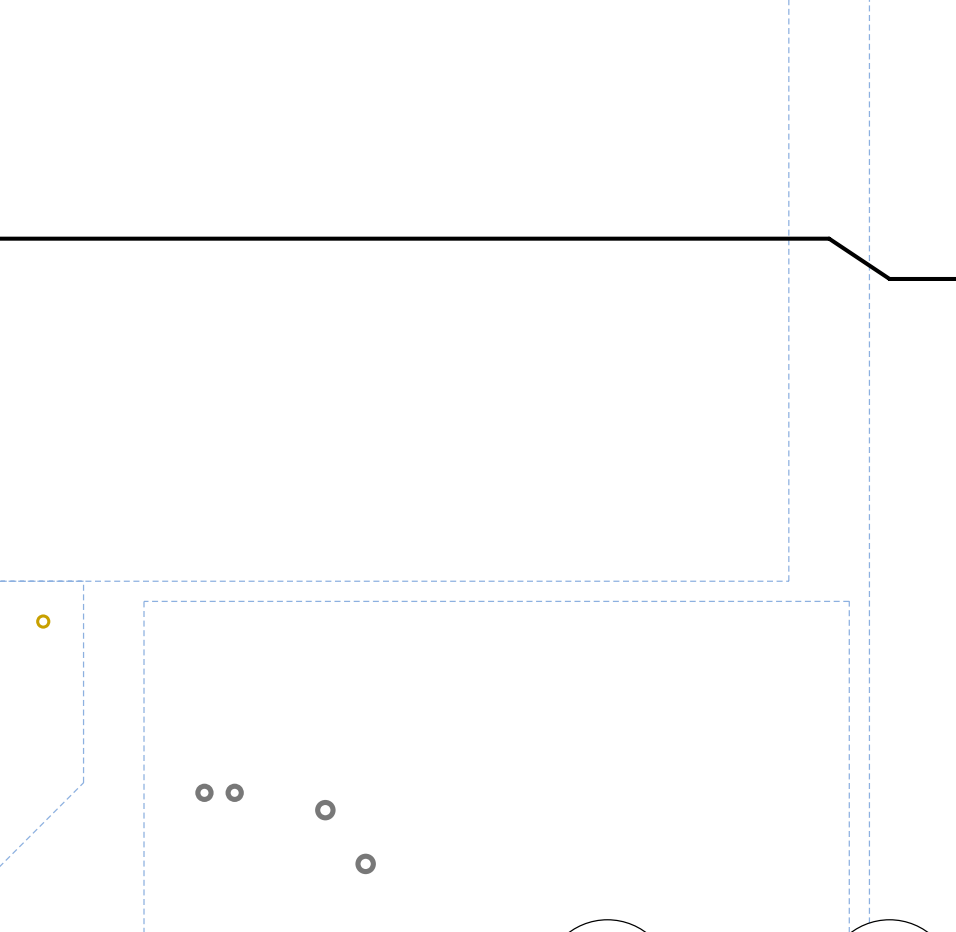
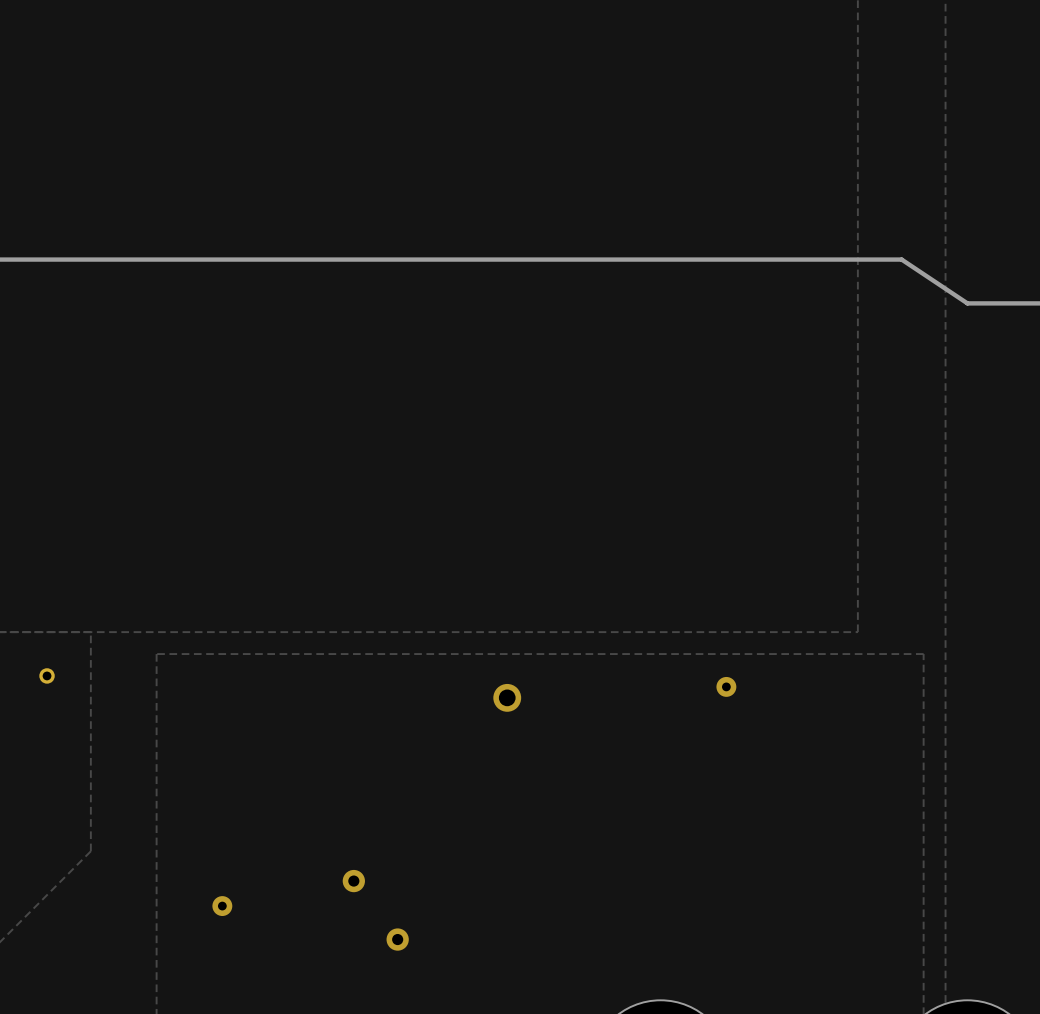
via: none -> (726, 686)
via: none -> (507, 697)
via: (204, 792) -> none
via: (234, 792) -> none
via: none -> (222, 906)

